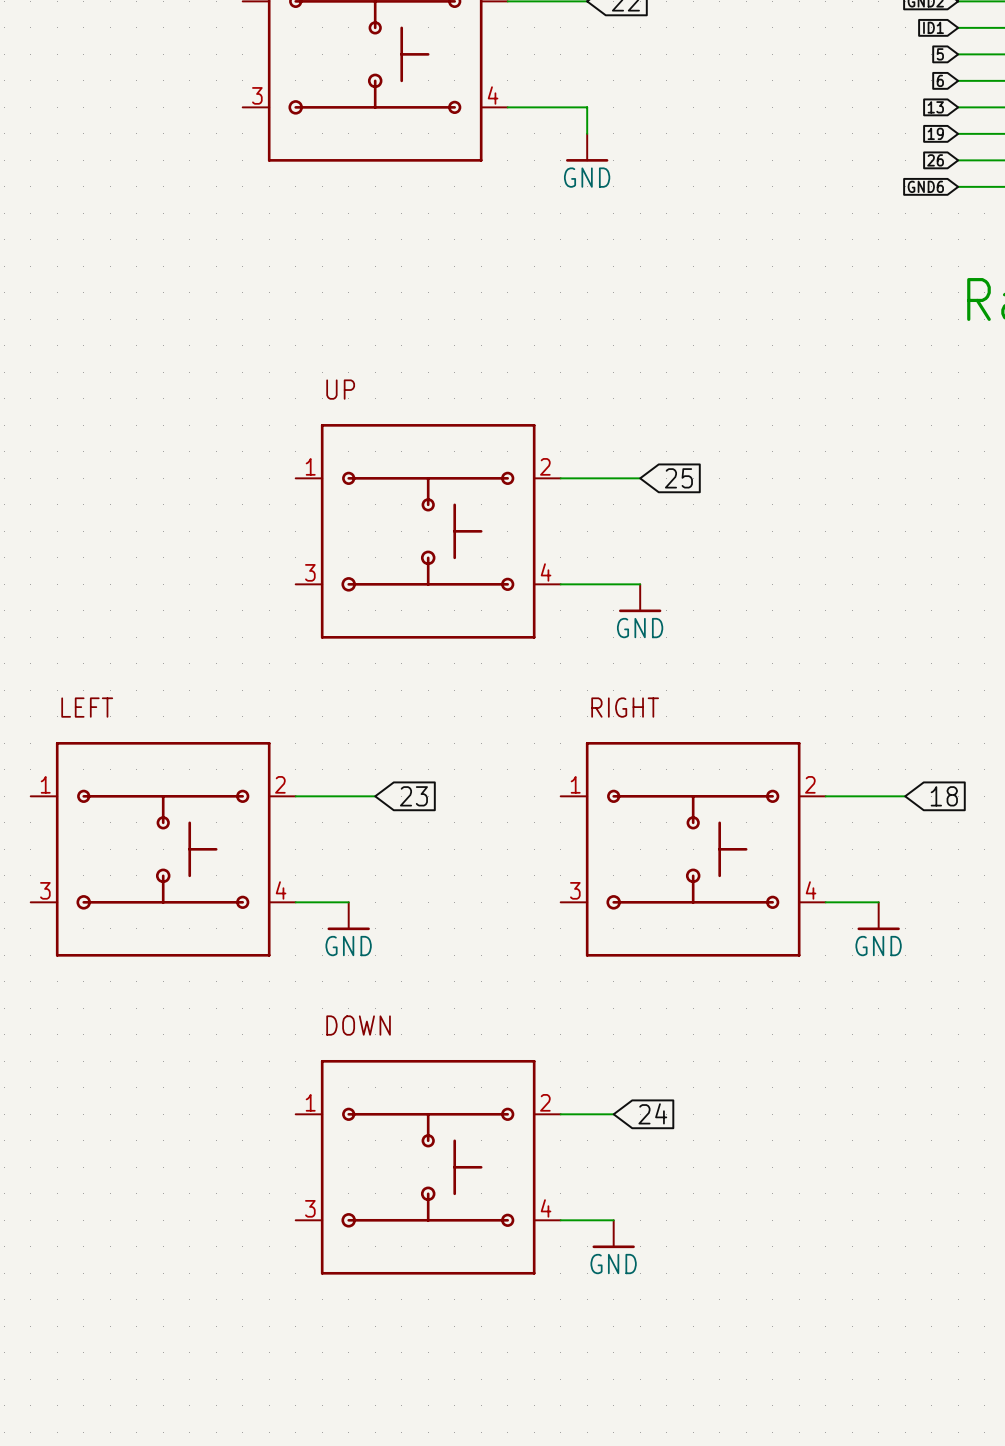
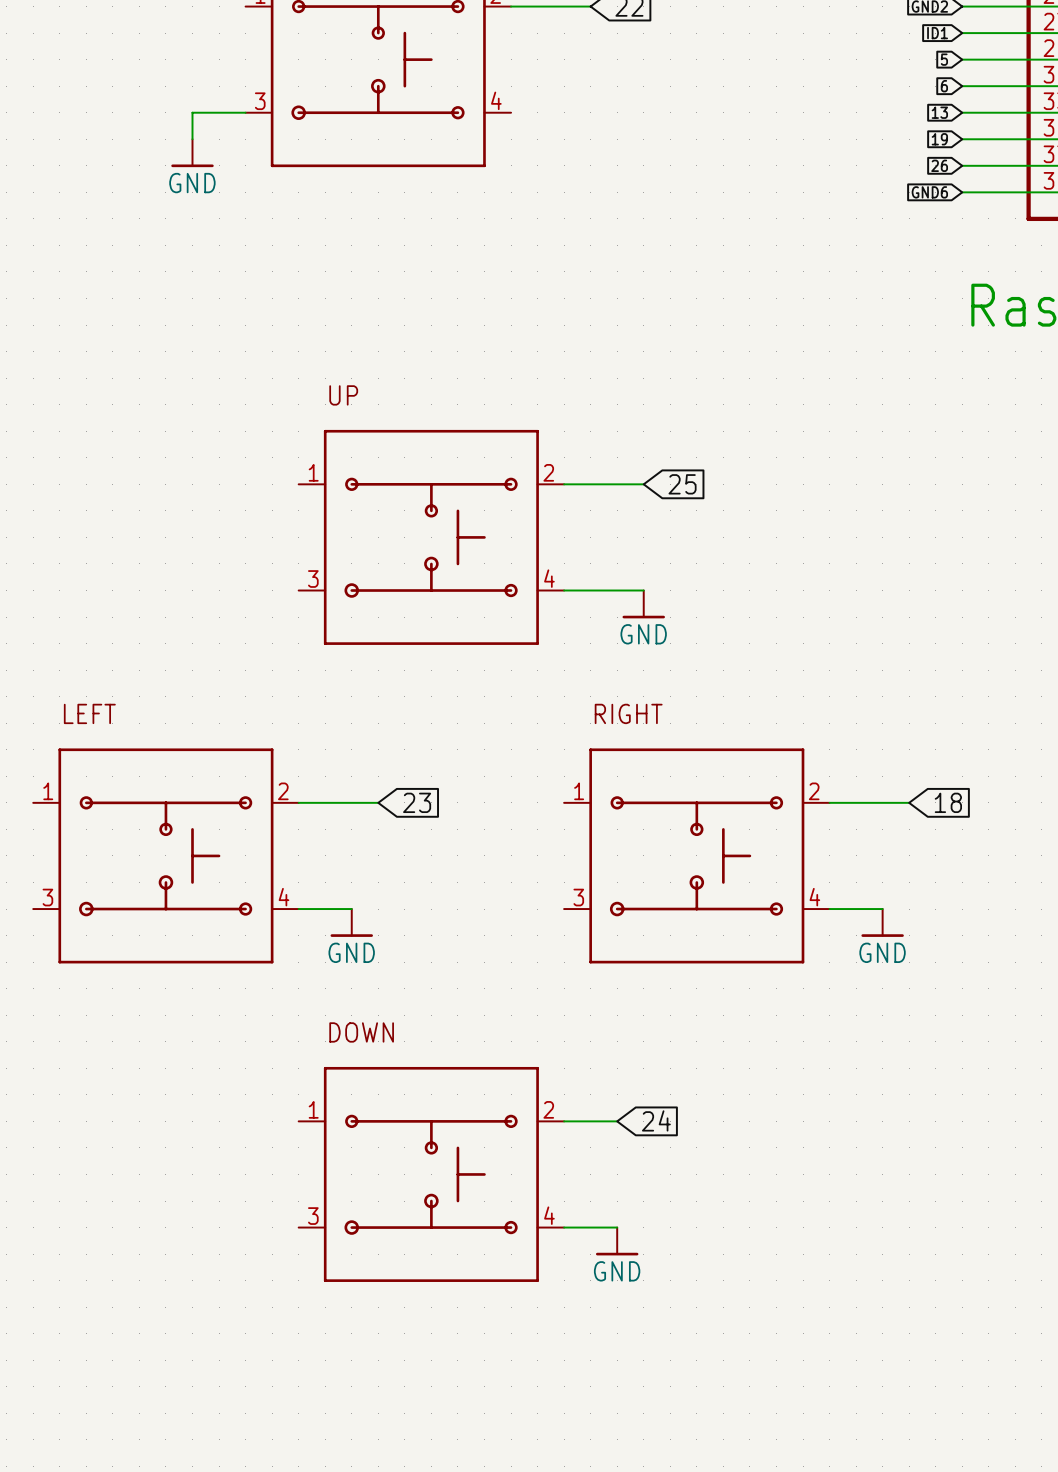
wire: none -> (245, 112) (192, 112) (192, 139)
wire: (507, 107) (587, 107) (587, 133) -> none
power symbol: none -> GND (192, 153)
power symbol: GND (587, 147) -> none

